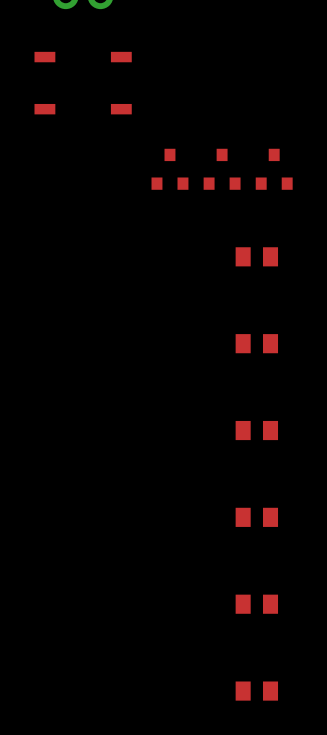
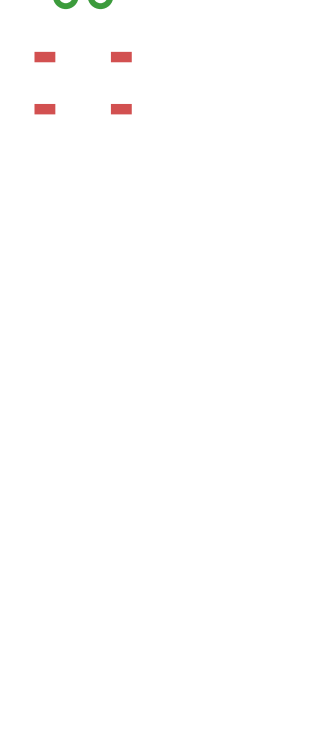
part: (169, 169) -> none
part: (222, 169) -> none
part: (274, 169) -> none
part: (256, 256) -> none
part: (256, 343) -> none
part: (256, 430) -> none
part: (256, 517) -> none
part: (256, 604) -> none
part: (256, 691) -> none

